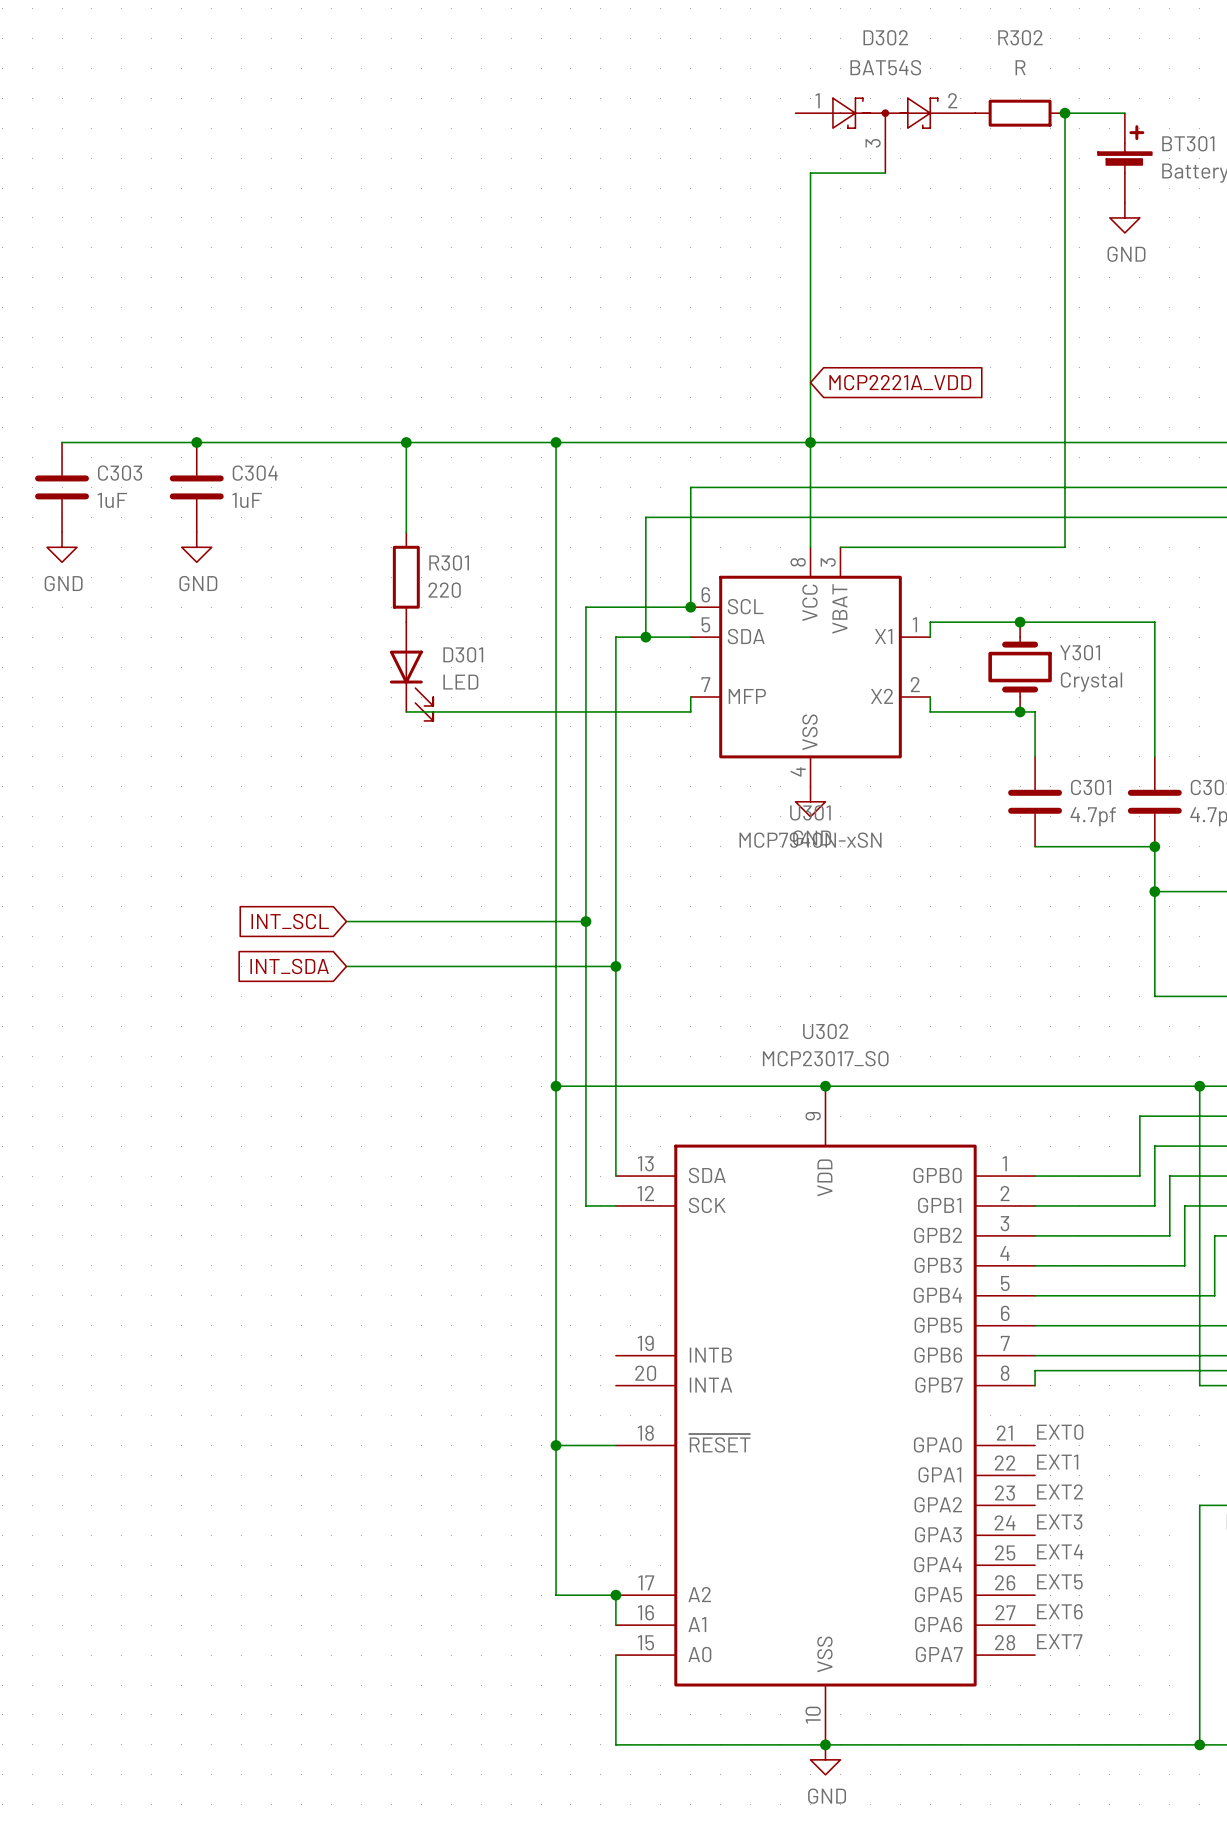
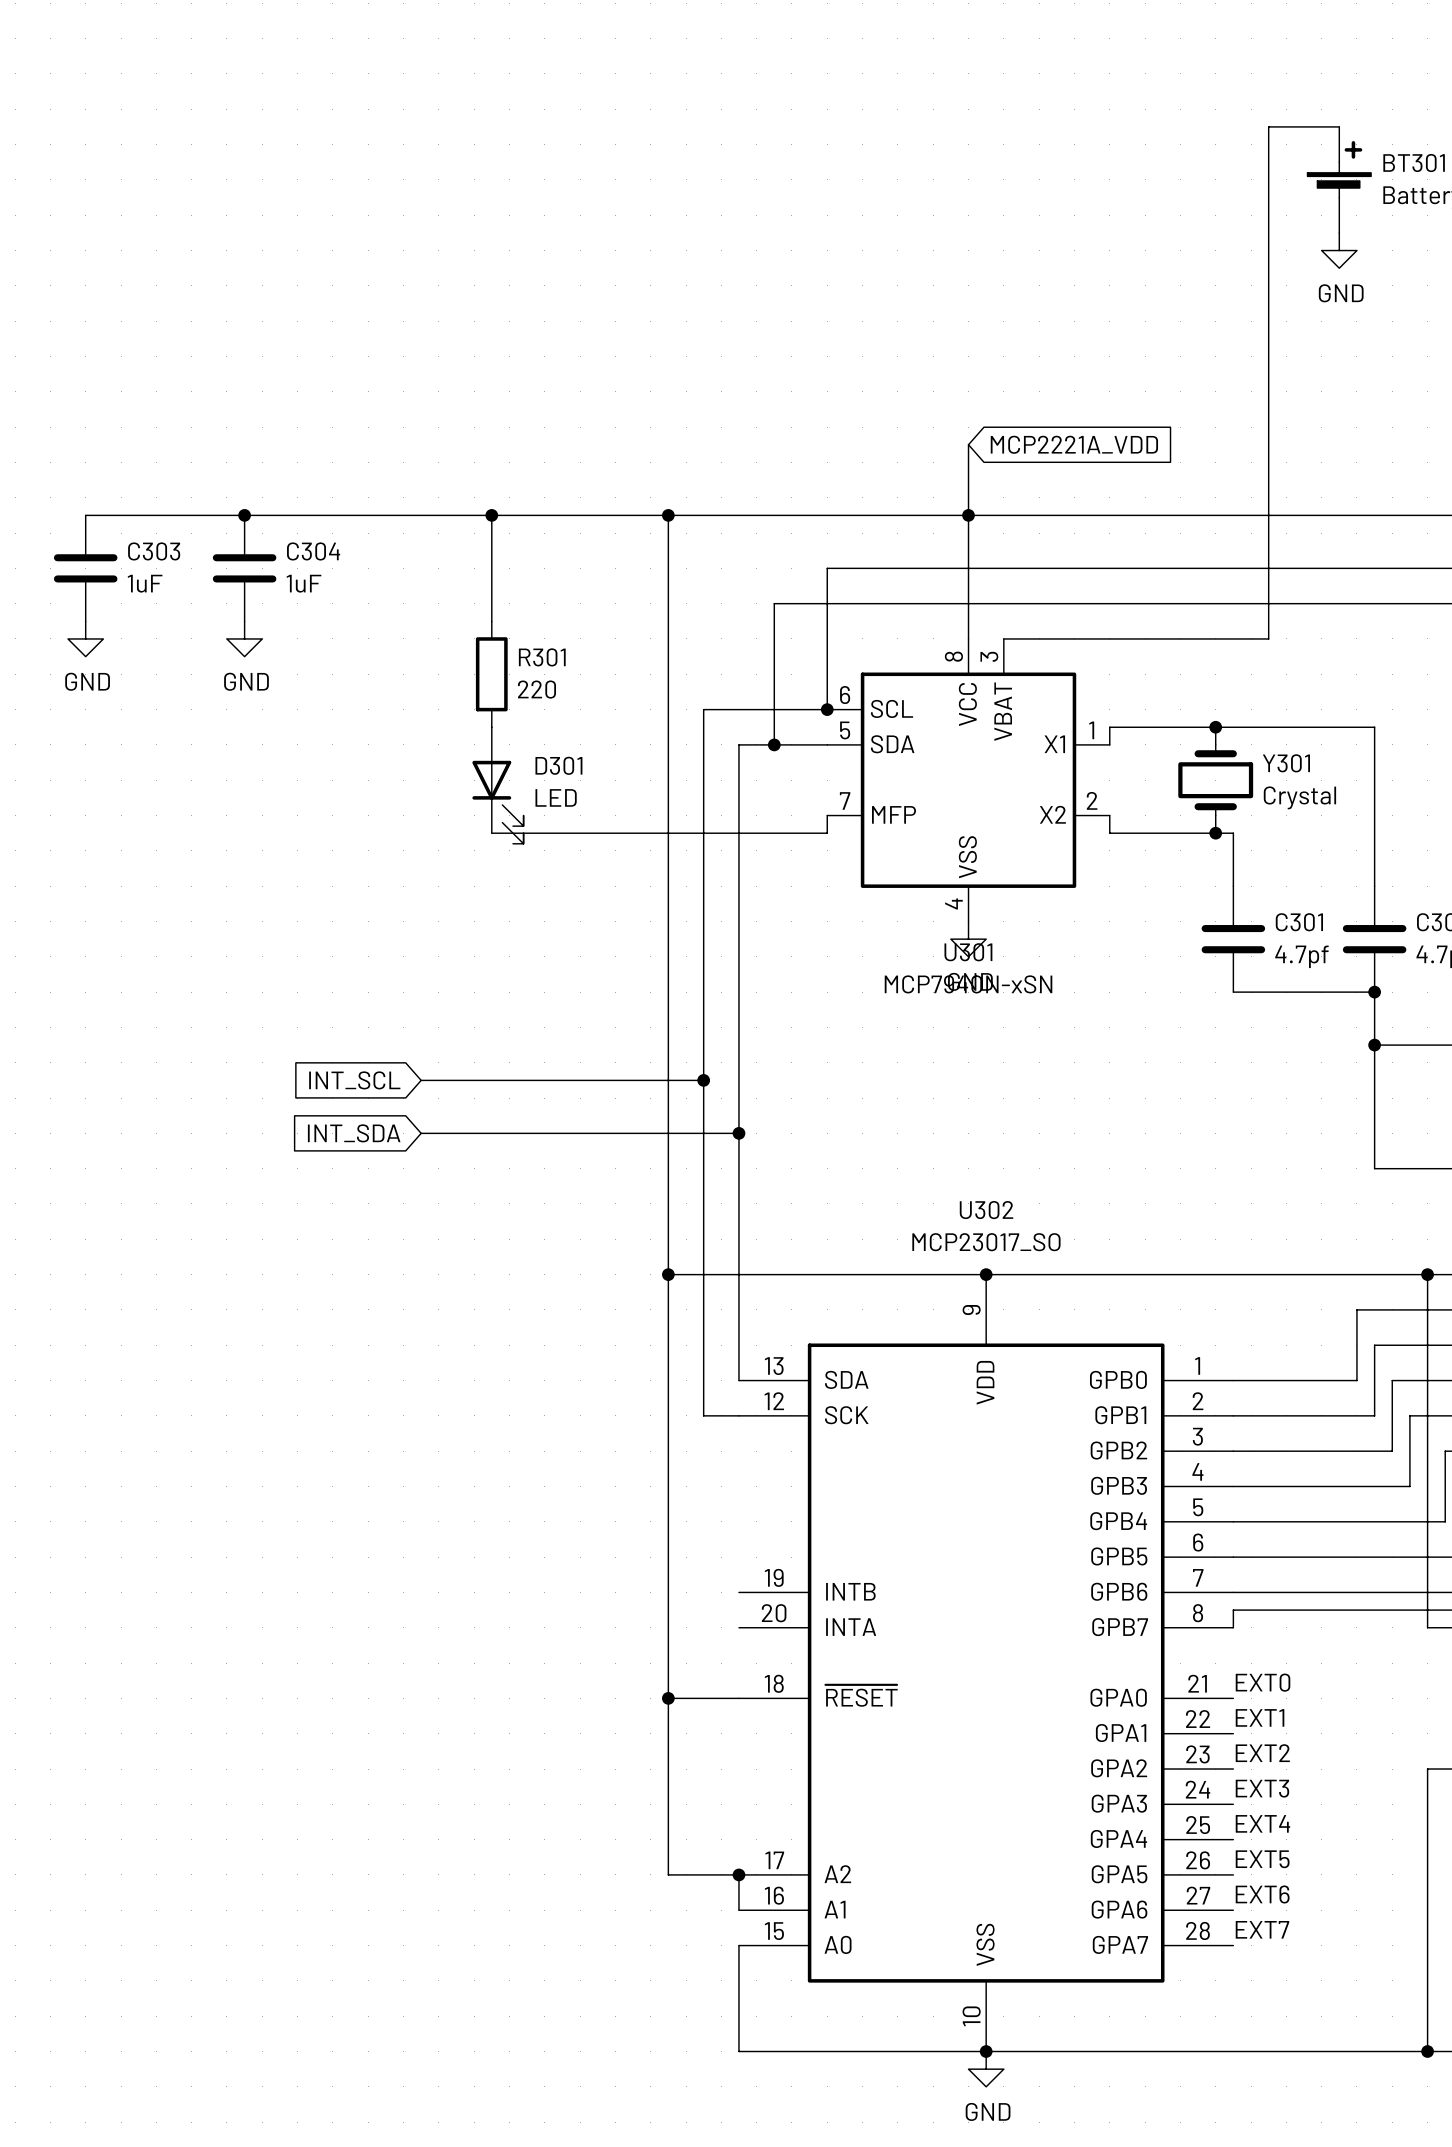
R302: R (1020, 113) -> none
junction: (1065, 113) -> none
D302: BAT54S (885, 135) -> none
wire: (885, 173) (810, 173) (810, 382) -> none

